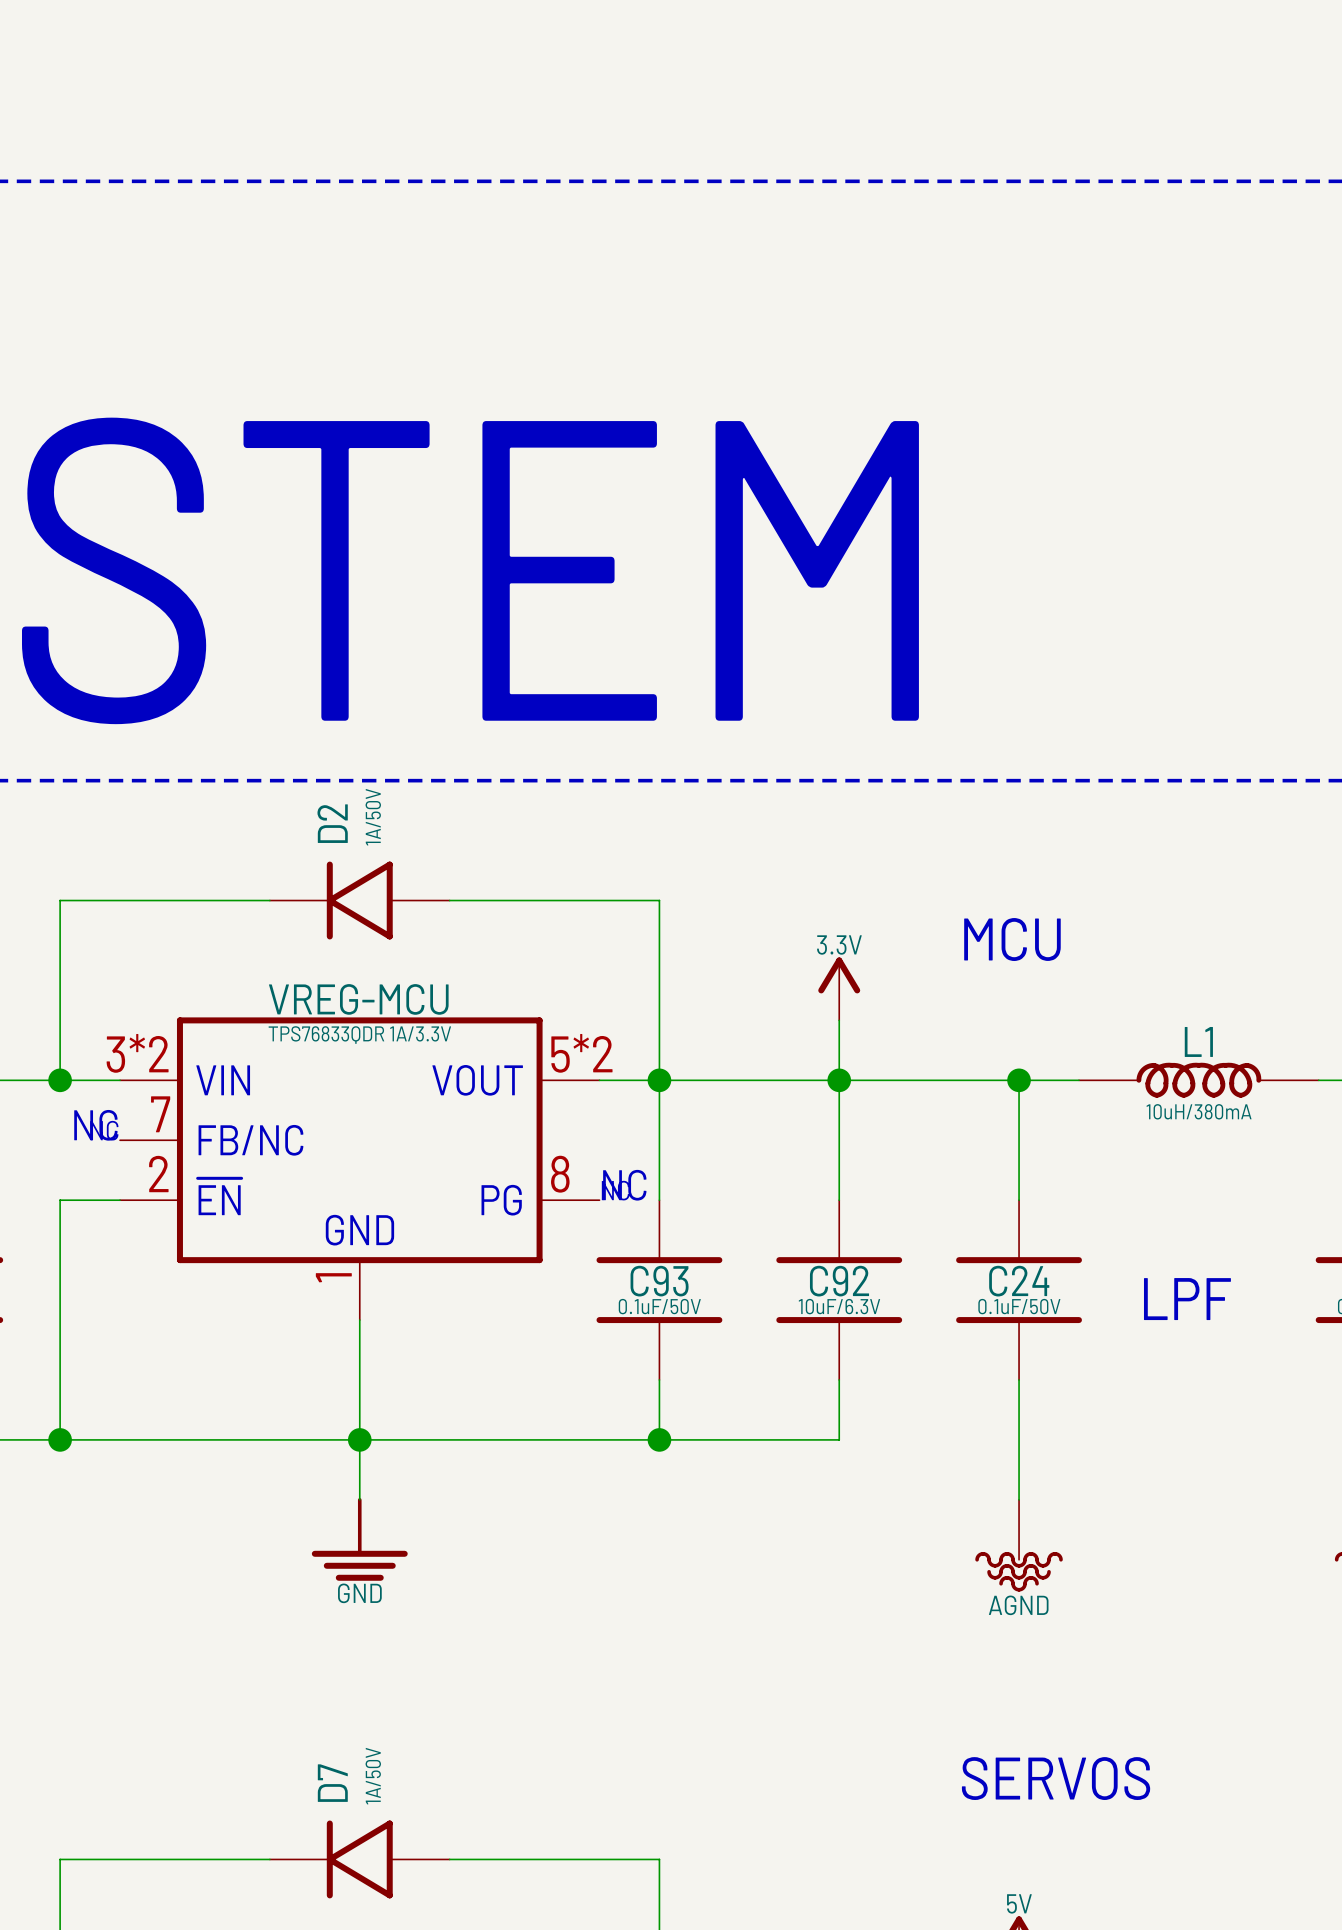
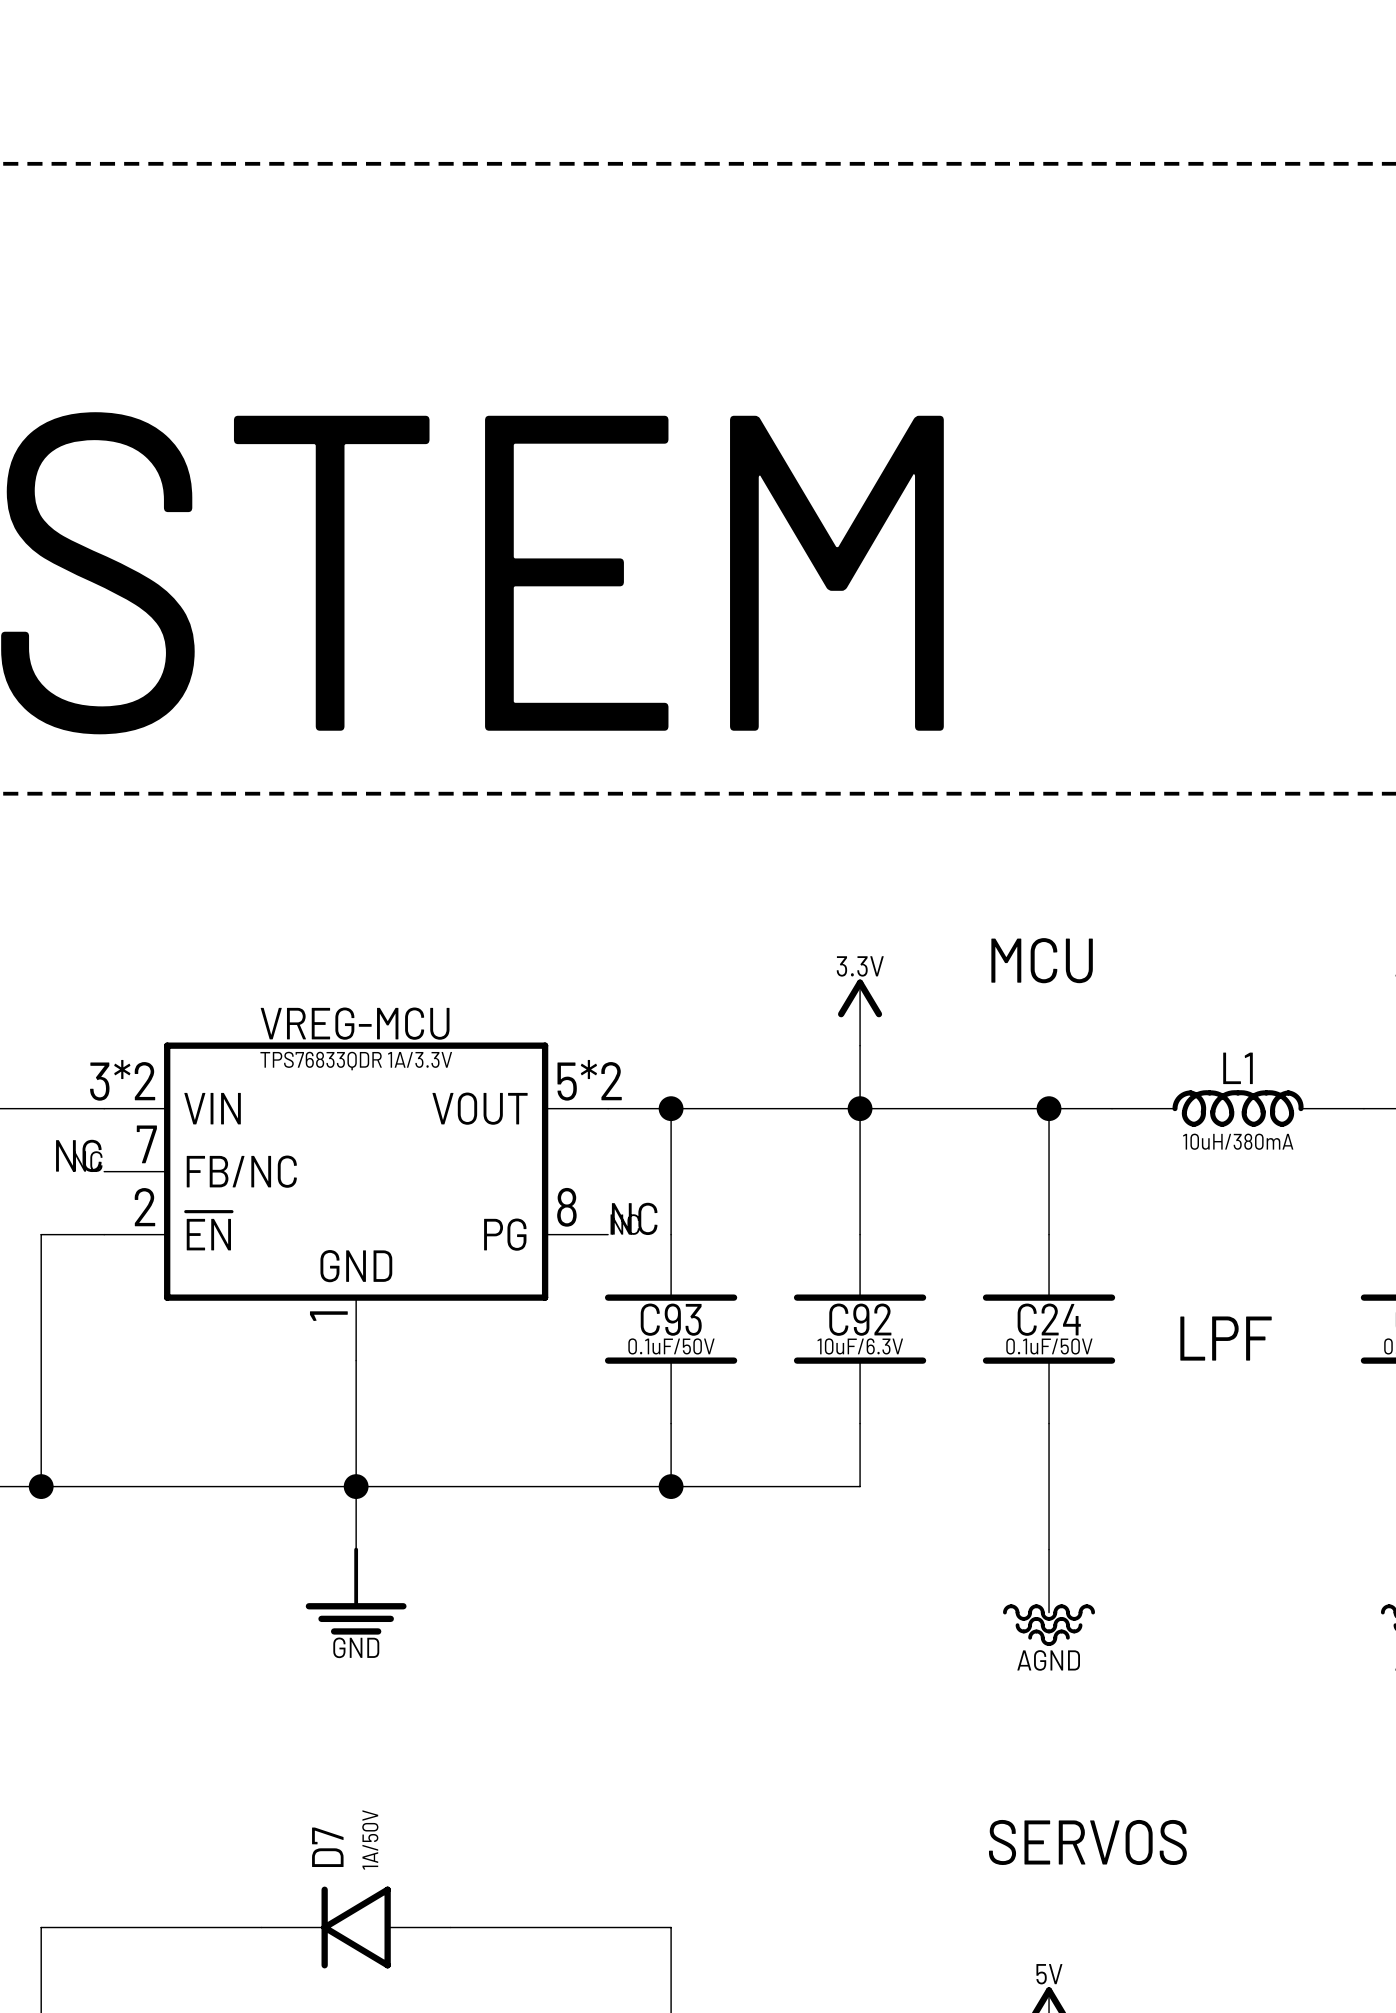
wire: (269, 900) (60, 900) (60, 1080) -> none
D2: 1A/50V (359, 900) -> none
wire: (449, 900) (659, 900) (659, 1080) -> none
junction: (60, 1080) -> none

